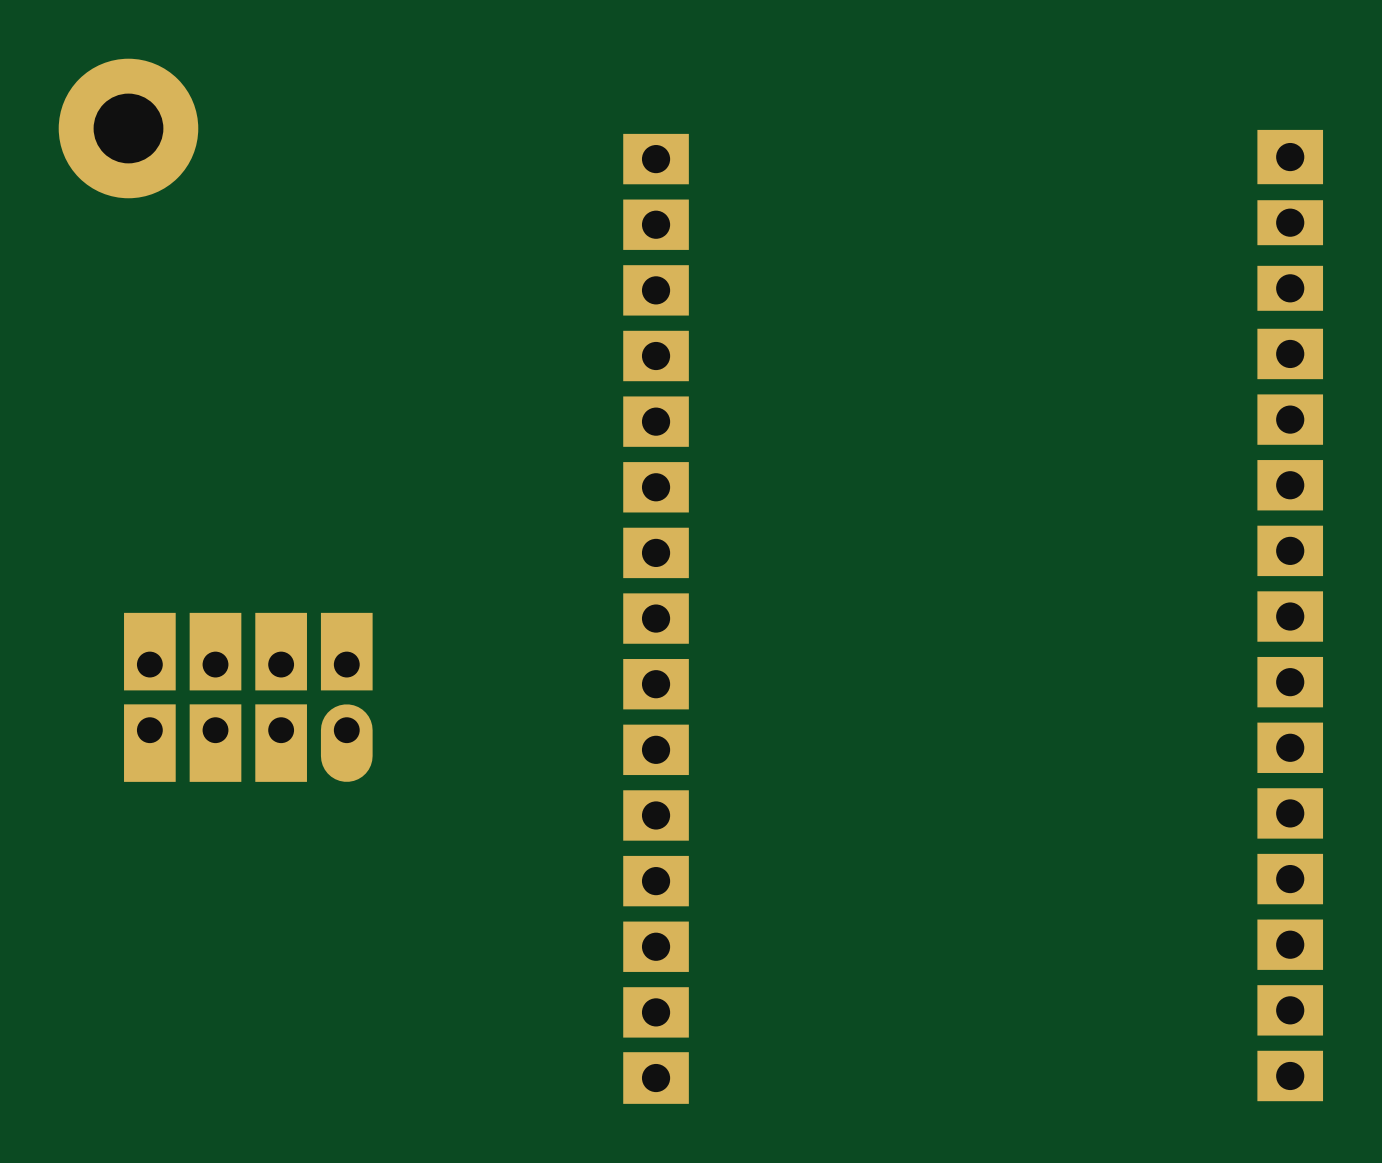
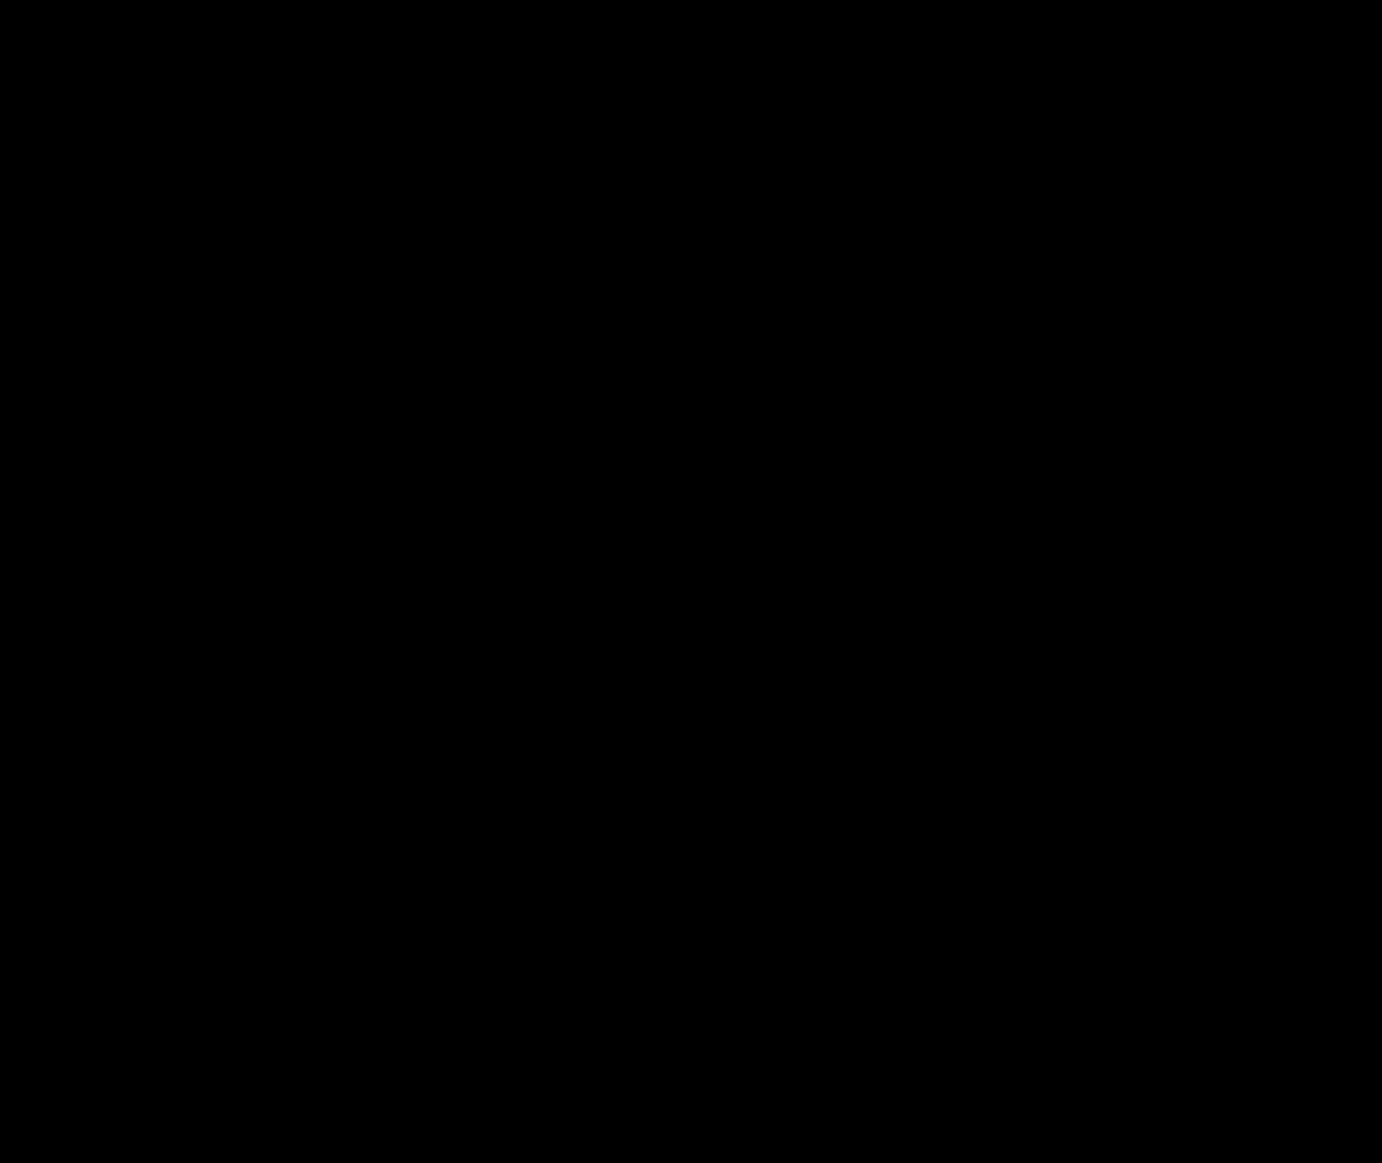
part: (128, 128) -> none
part: (1290, 615) -> none
part: (656, 618) -> none
part: (248, 697) -> none

